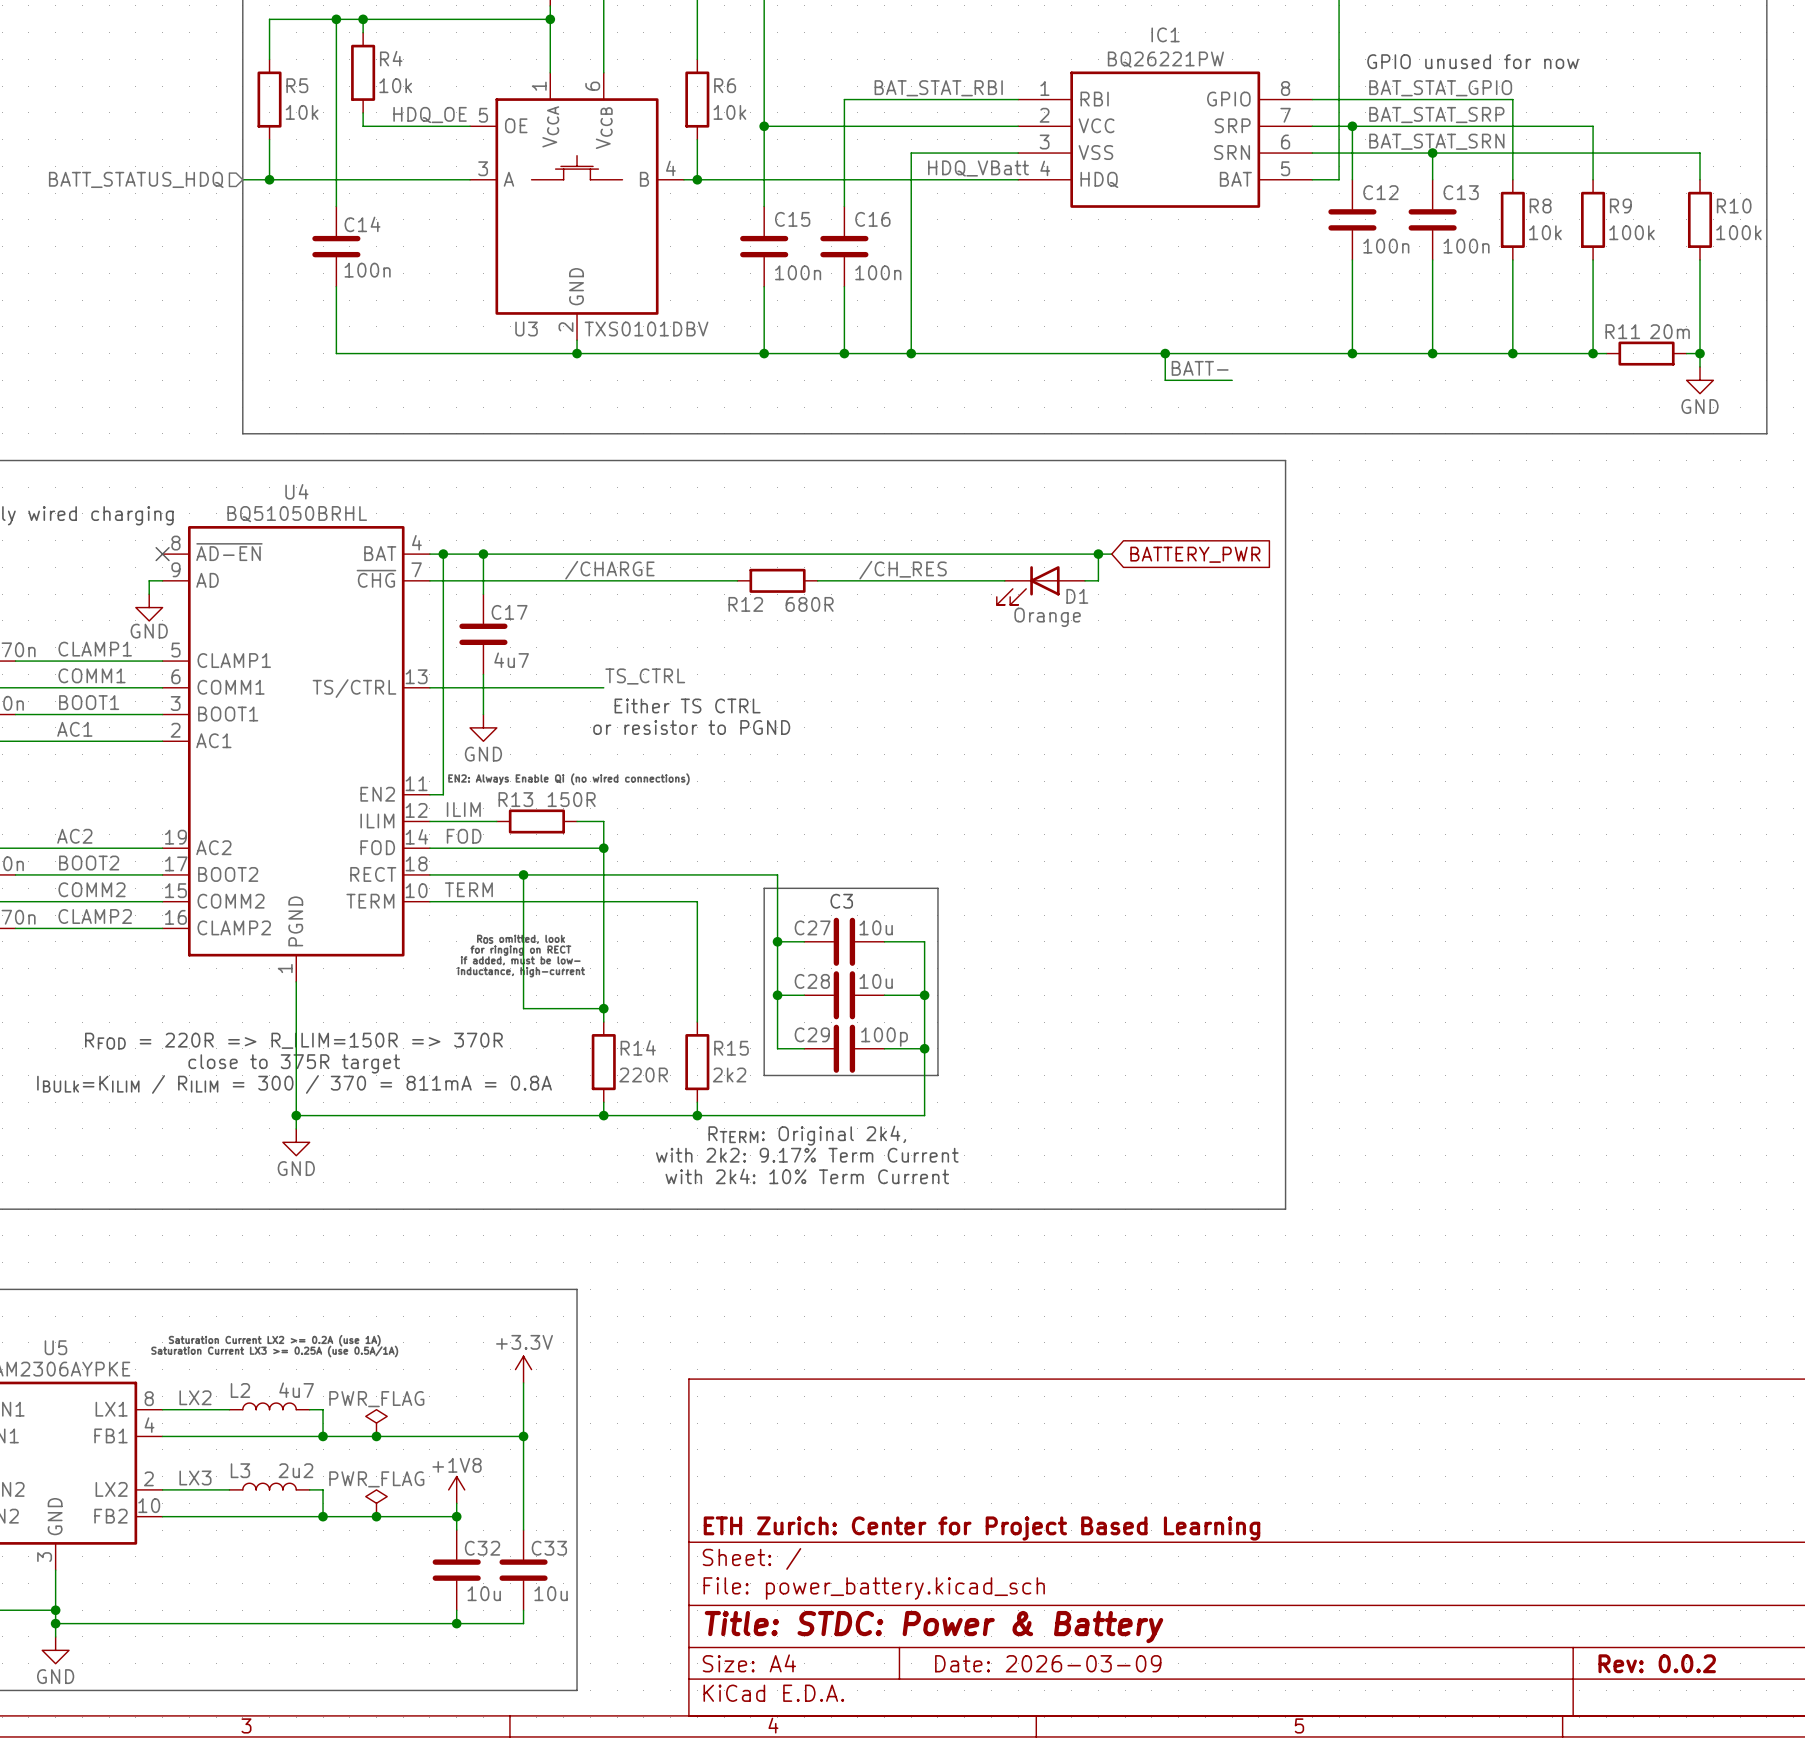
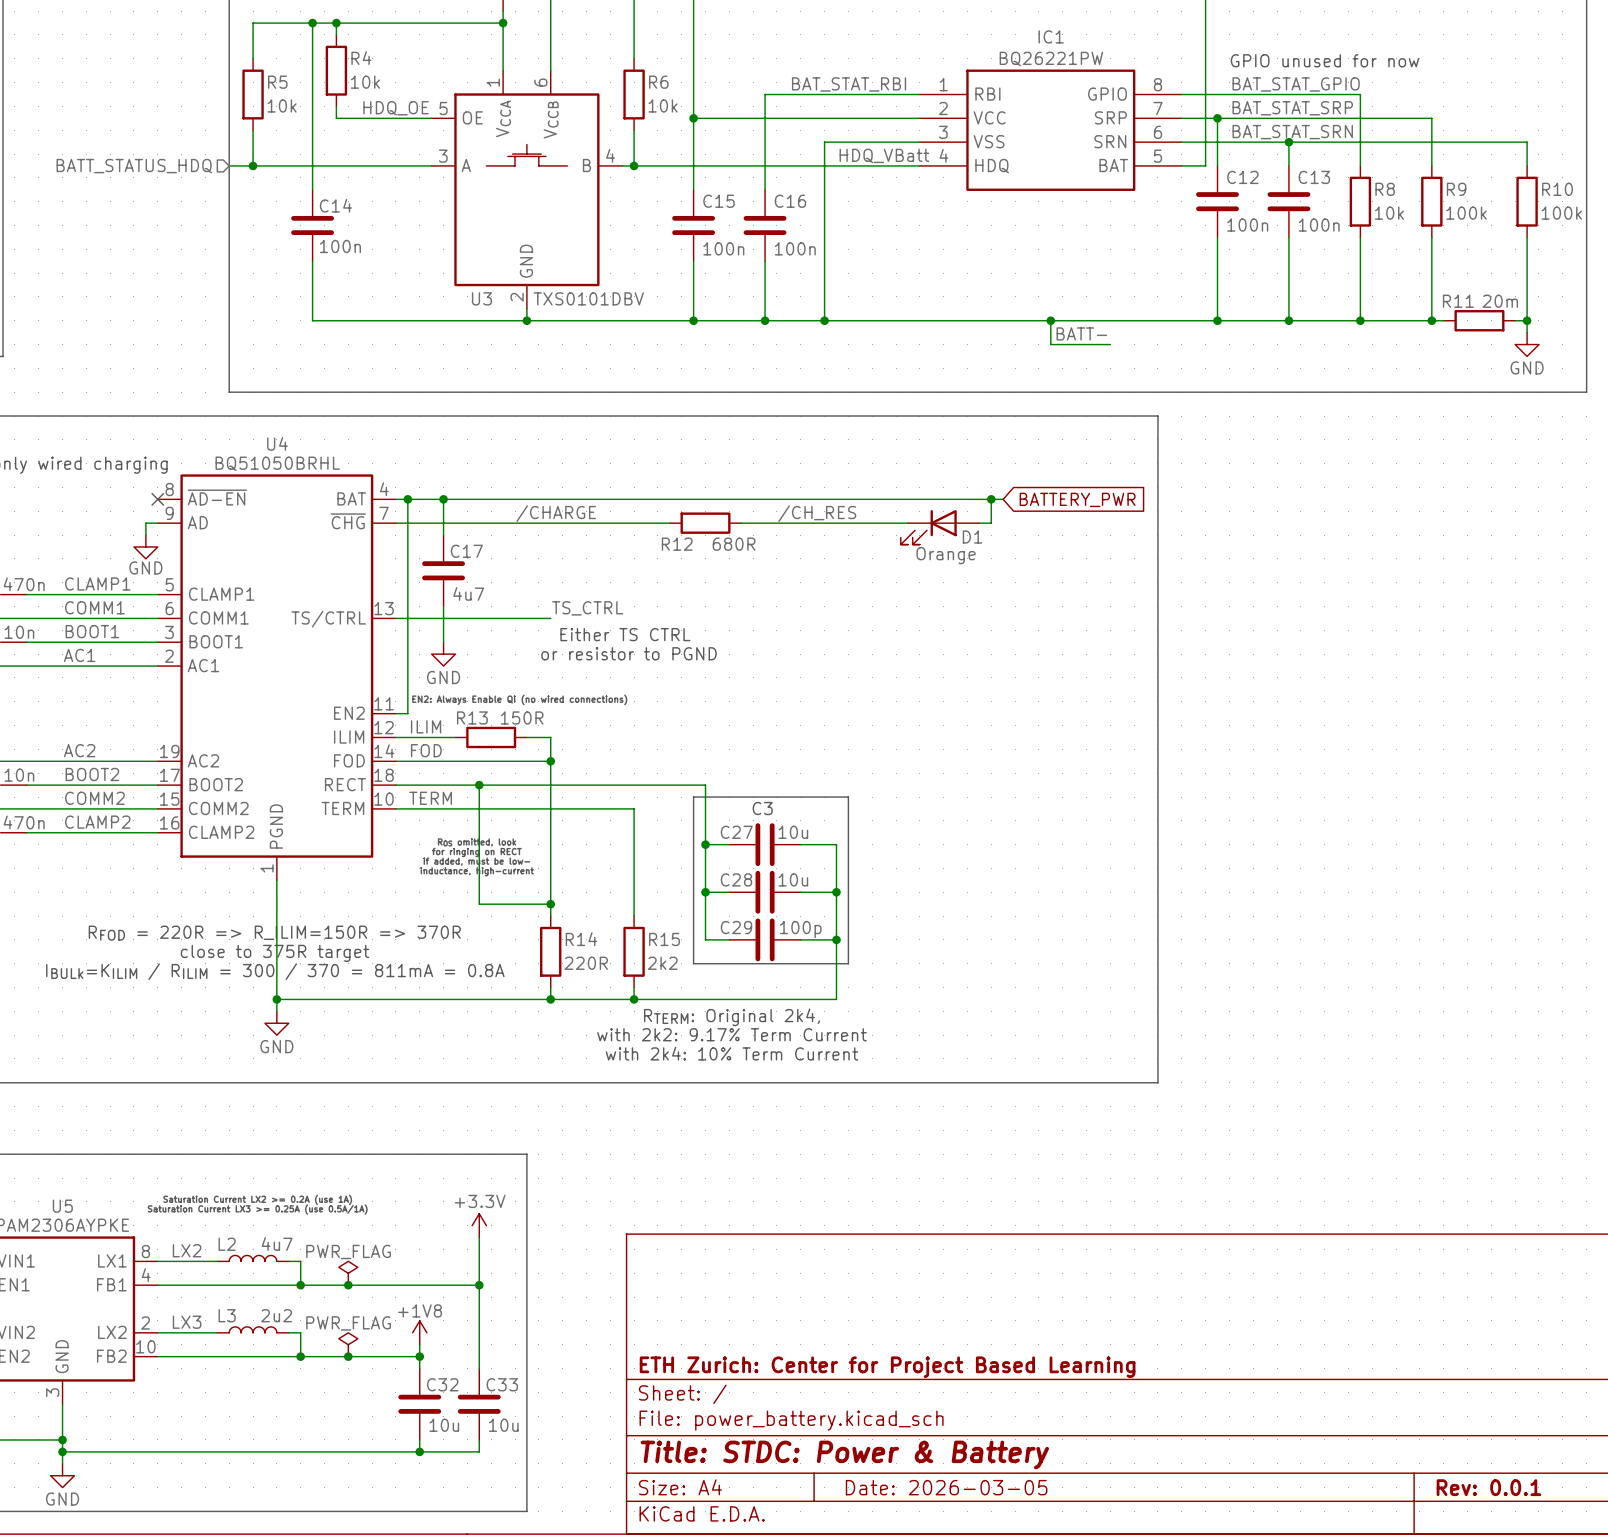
title block: Date: 2026-03-09 (1048, 1663) -> Date: 2026-03-05 (946, 1487)
title block: Rev: 0.0.2 (1657, 1663) -> Rev: 0.0.1 (1488, 1487)

